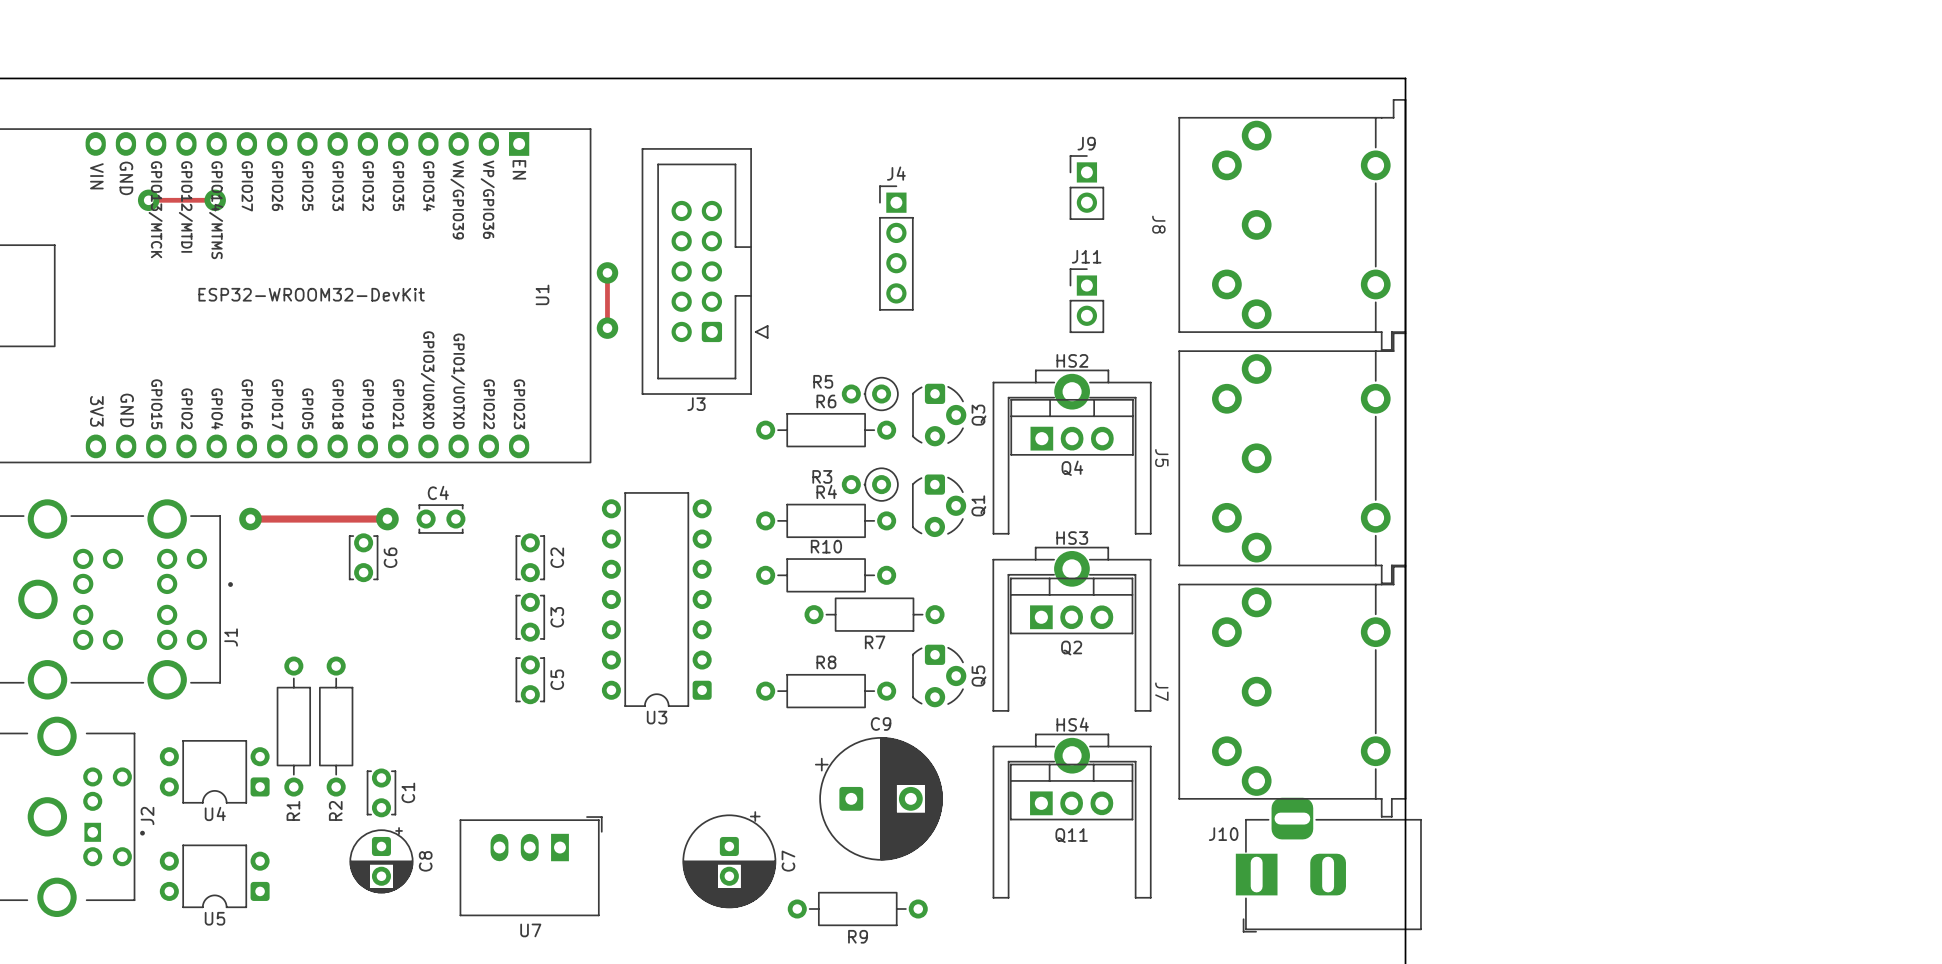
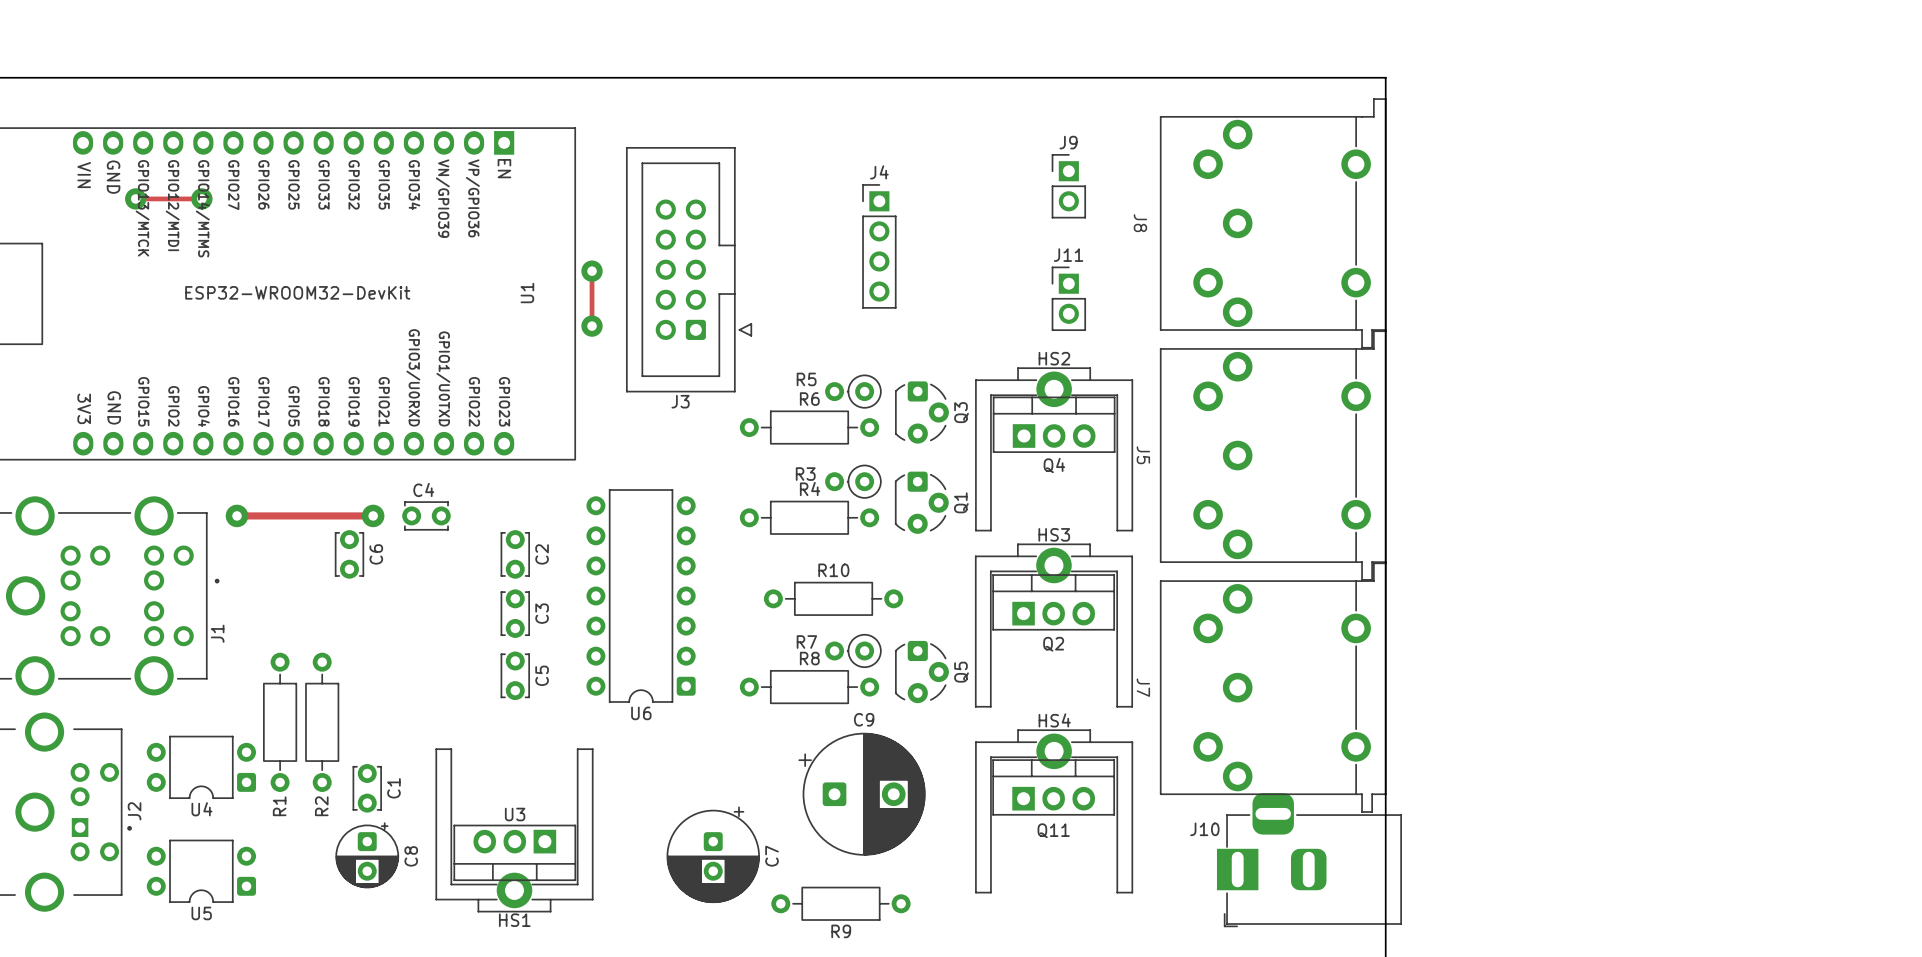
R10 position: (826, 575) -> (833, 598)
R7 footprint: [804, 597, 945, 632] -> [825, 634, 882, 668]
R7 name position: R7 (875, 642) -> R7 (806, 642)
U3 name: U3 (657, 717) -> U6 (641, 713)
HS1: none -> (514, 830)
U3: none -> (514, 852)
U7: (531, 866) -> none

